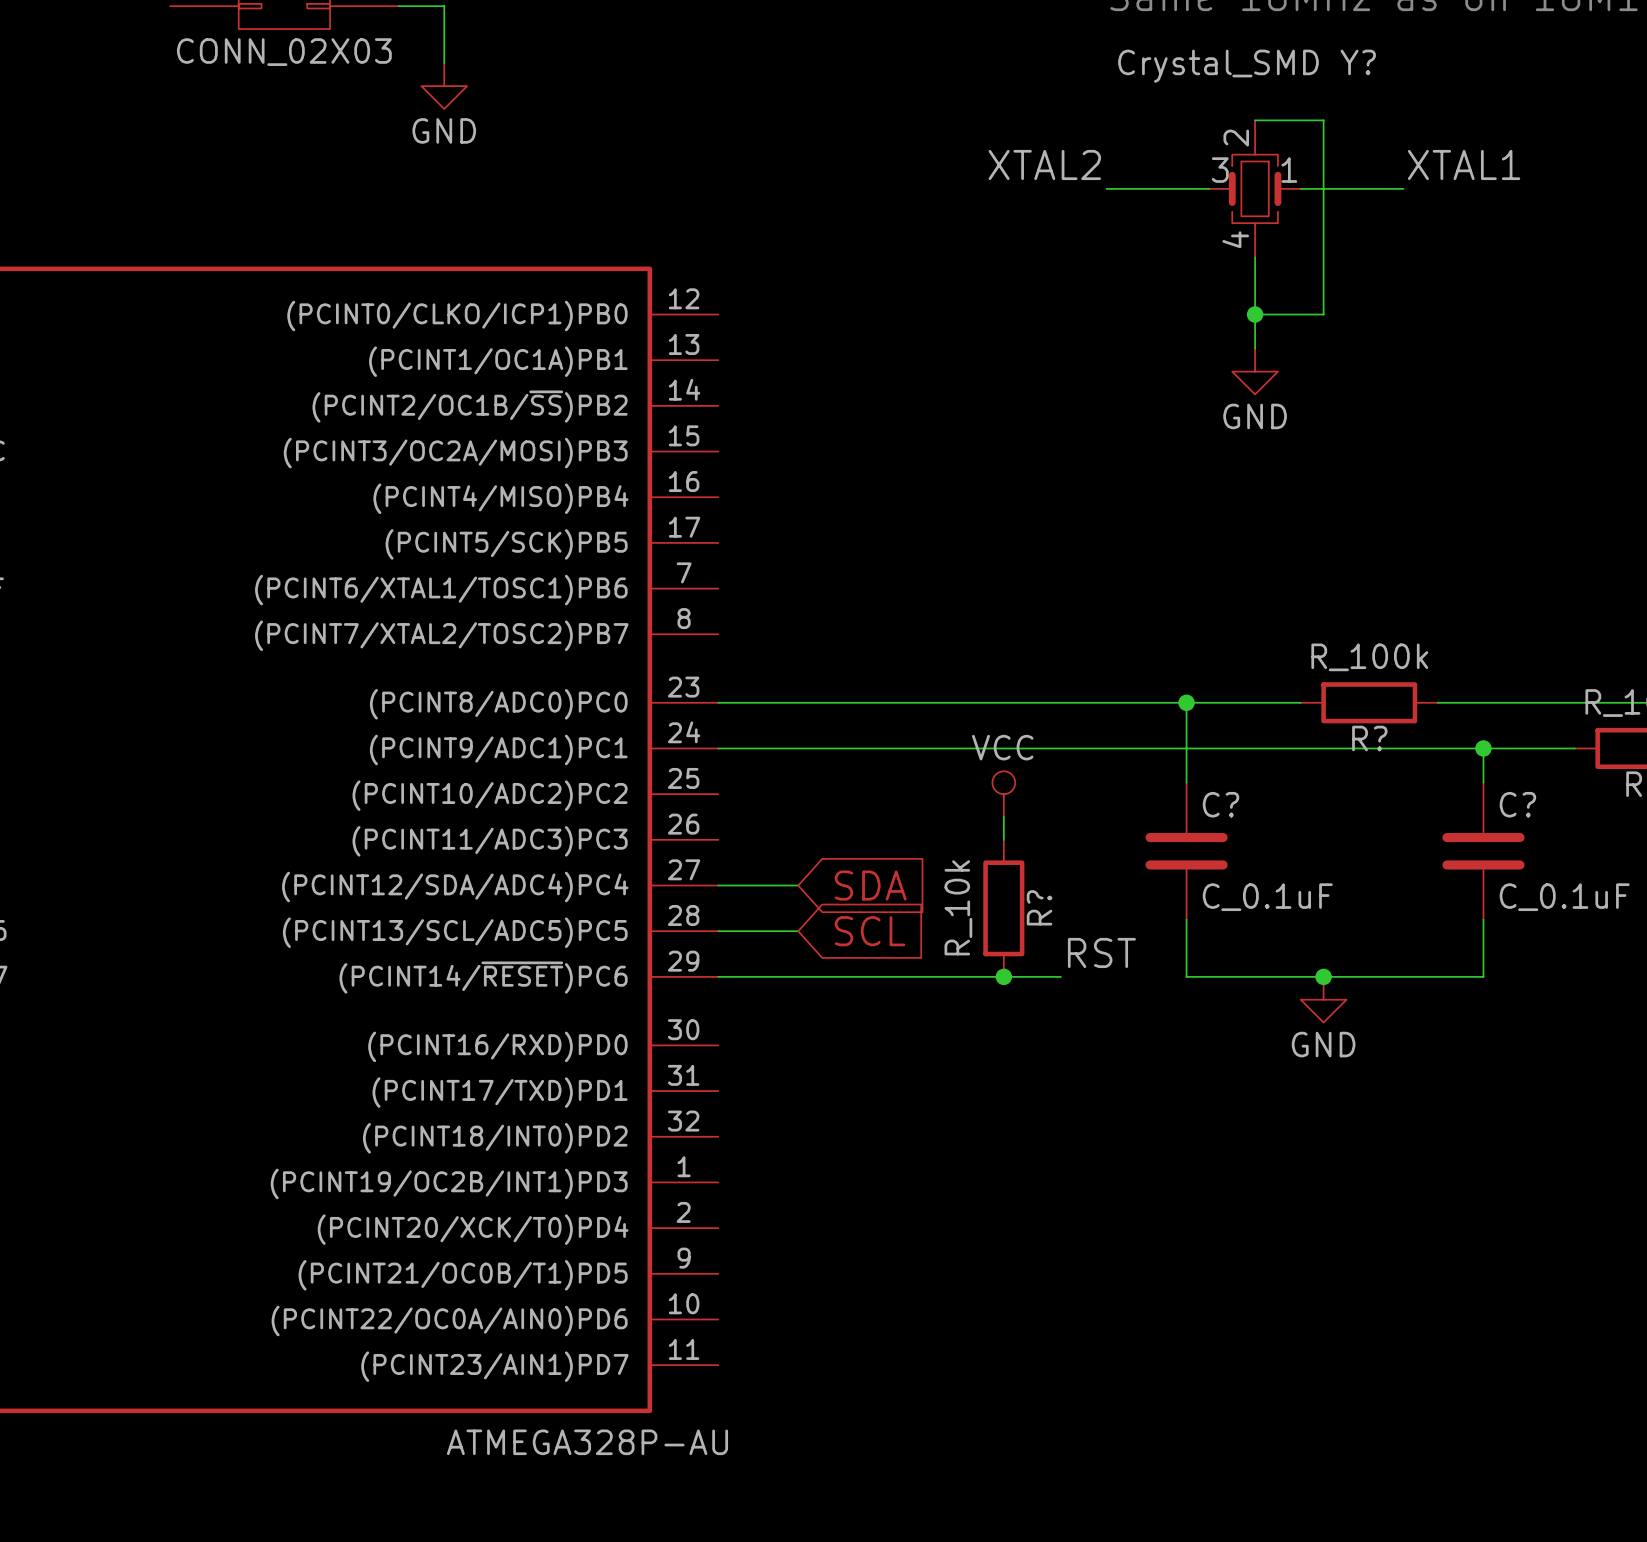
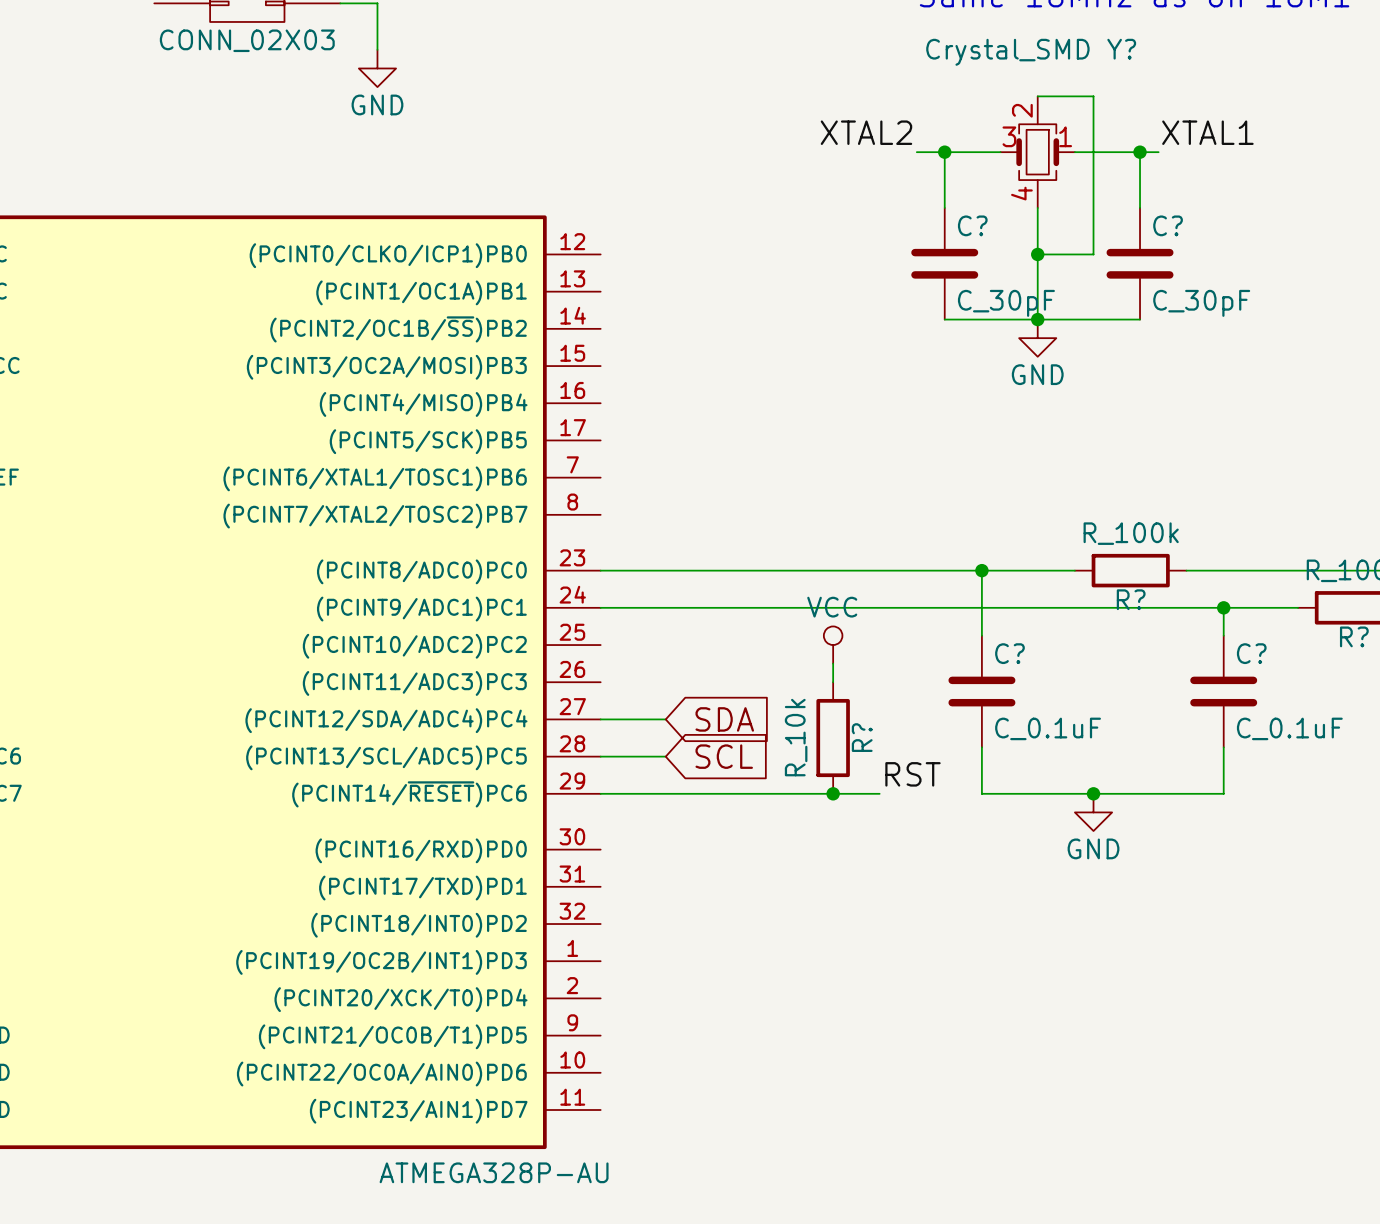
wire: none -> (944, 152) (944, 207)
junction: none -> (944, 152)
wire: none -> (1140, 152) (1140, 207)
junction: none -> (1140, 152)
C?: none -> C_30pF (944, 263)
C?: none -> C_30pF (1140, 263)
power symbol position: GND (1255, 371) -> GND (1037, 338)
wire: none -> (944, 319) (1140, 319)
junction: none -> (1037, 319)

